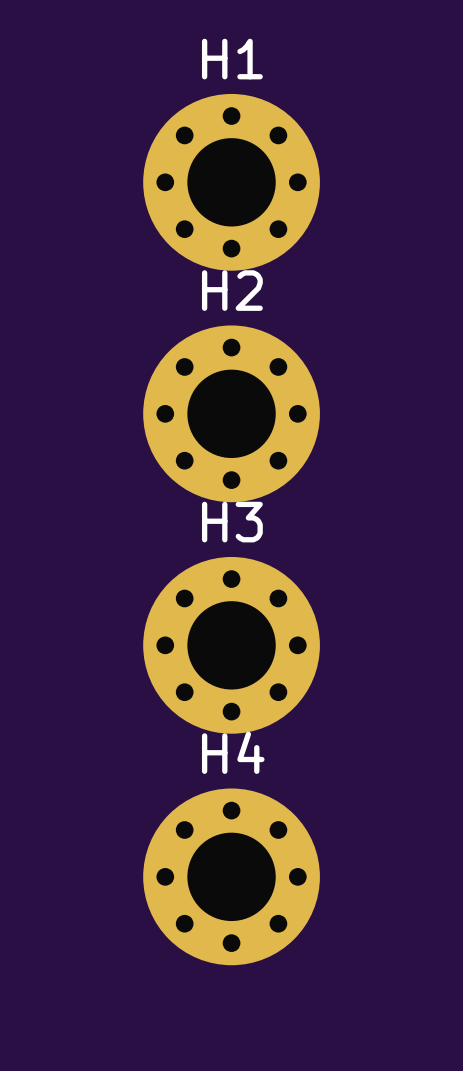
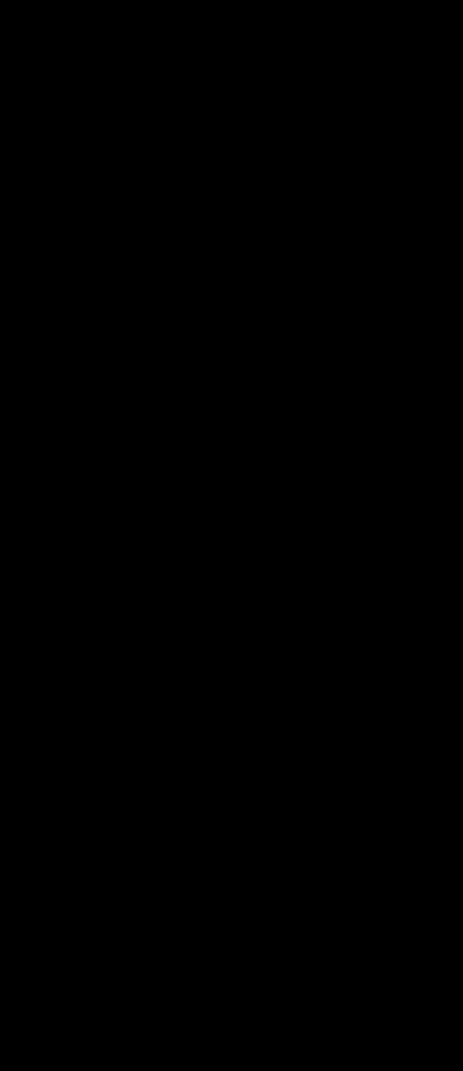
H1: (231, 182) -> none
H2: (231, 413) -> none
H3: (231, 645) -> none
H4: (231, 876) -> none

